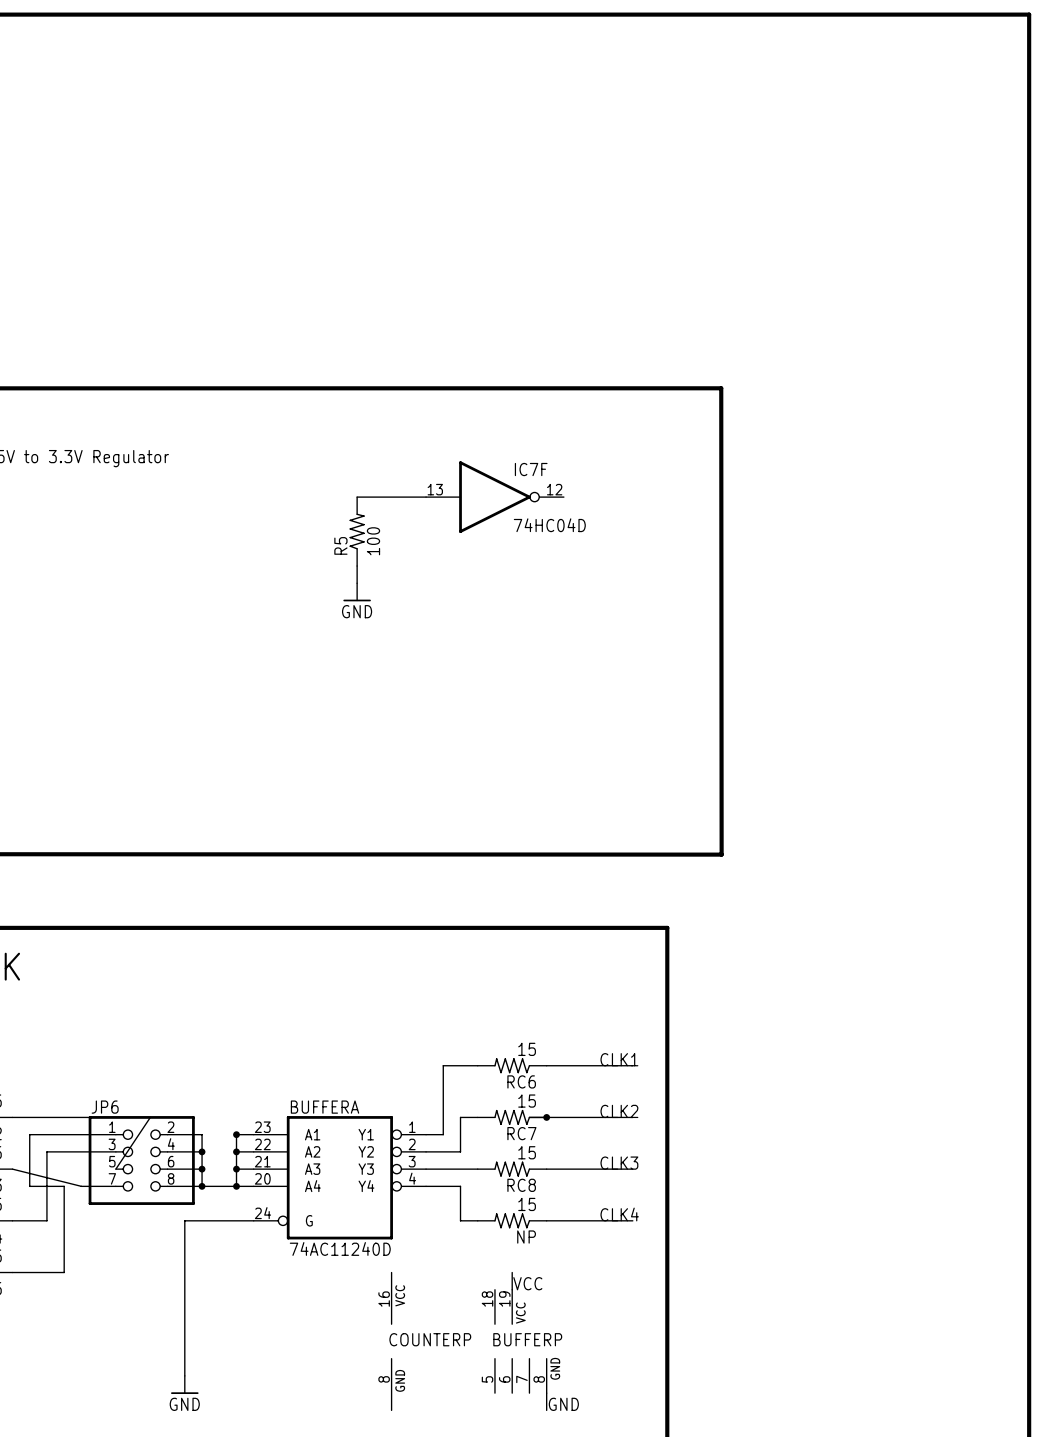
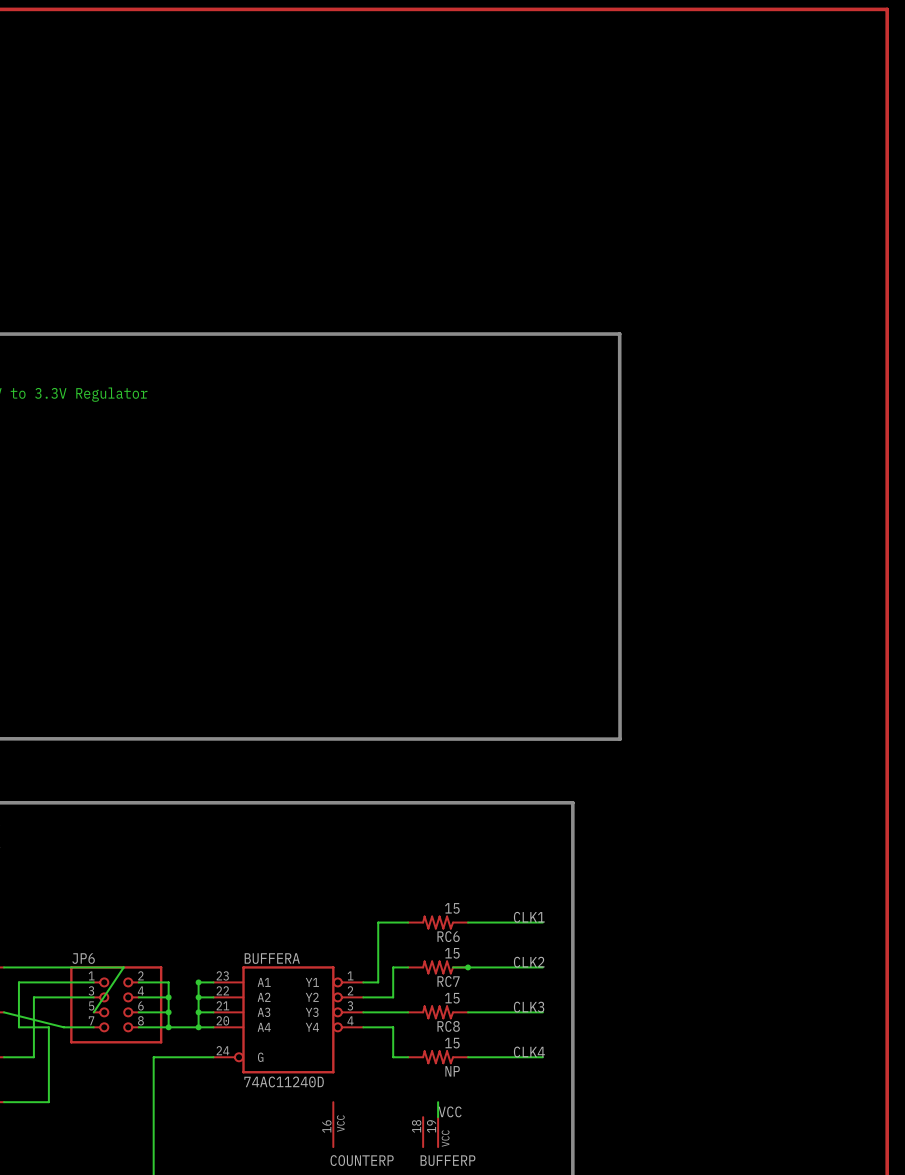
wire: (357, 497) (426, 497) -> none
IC7F: 74HC04D (494, 497) -> none
R5: 100 (357, 531) -> none
wire: (357, 566) (357, 583) -> none
power symbol: GND (357, 592) -> none

